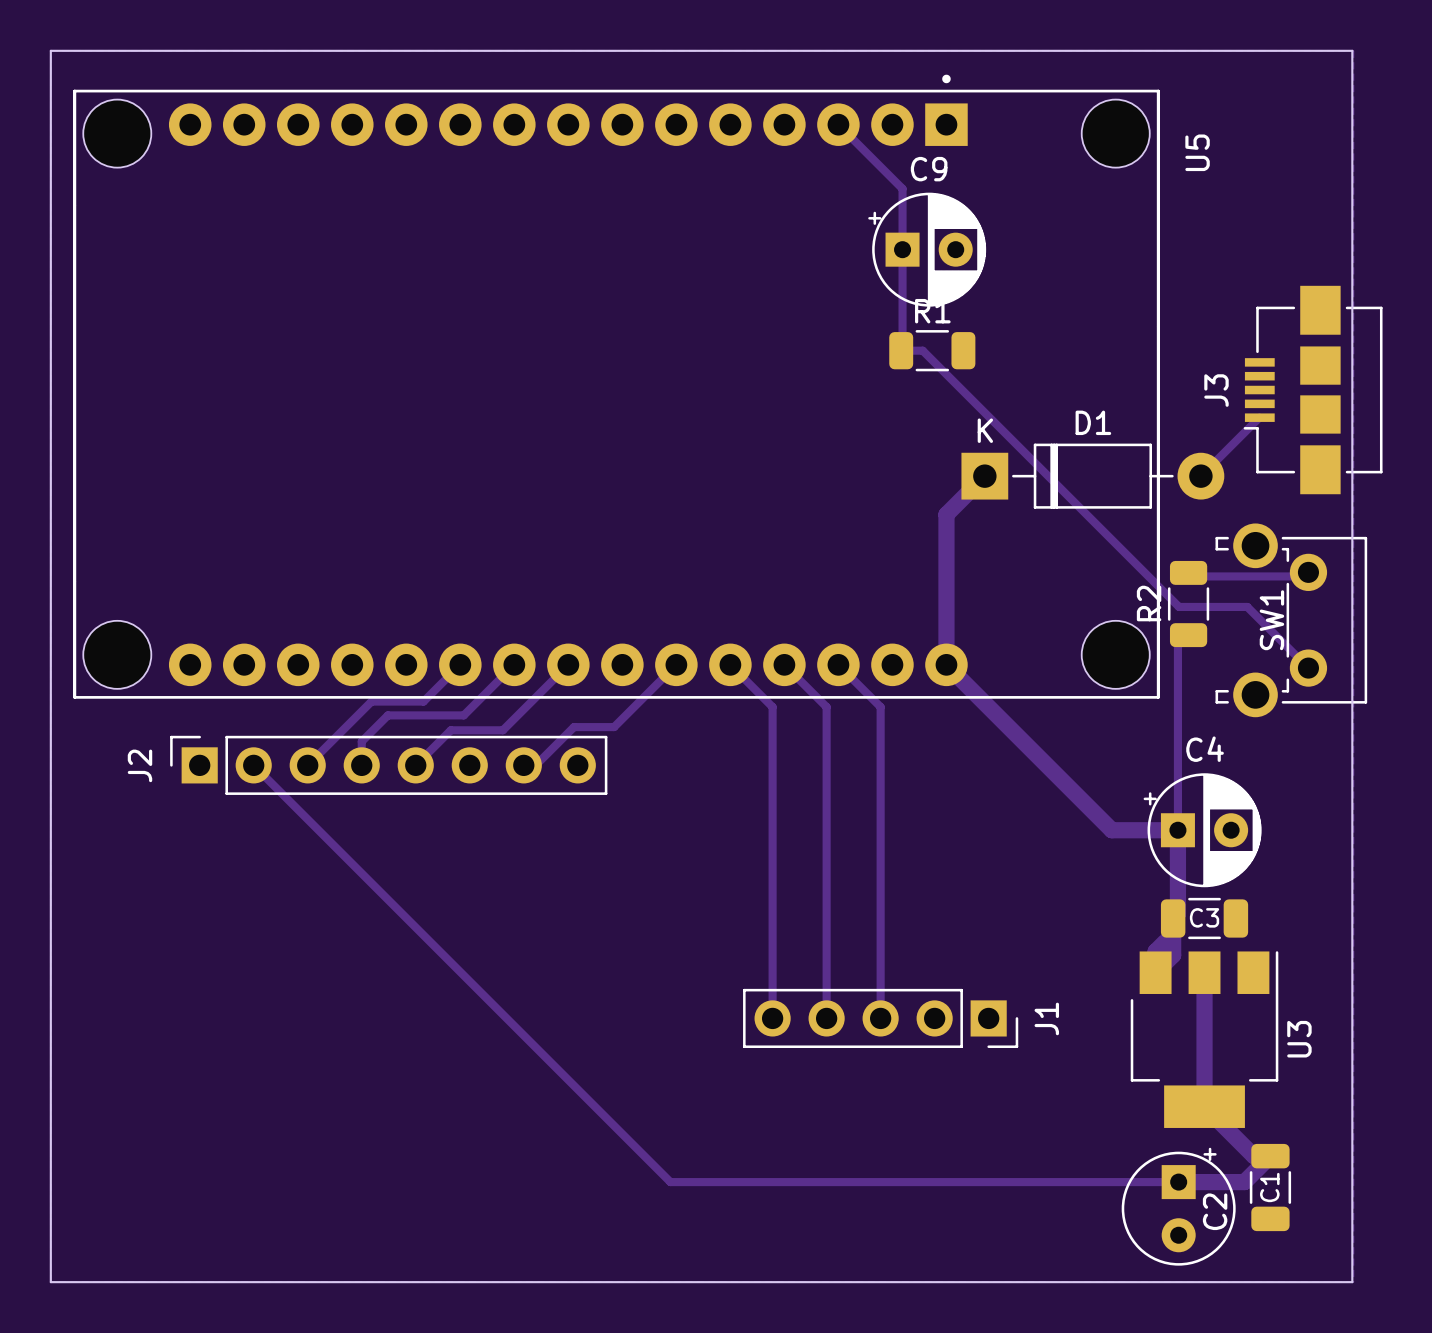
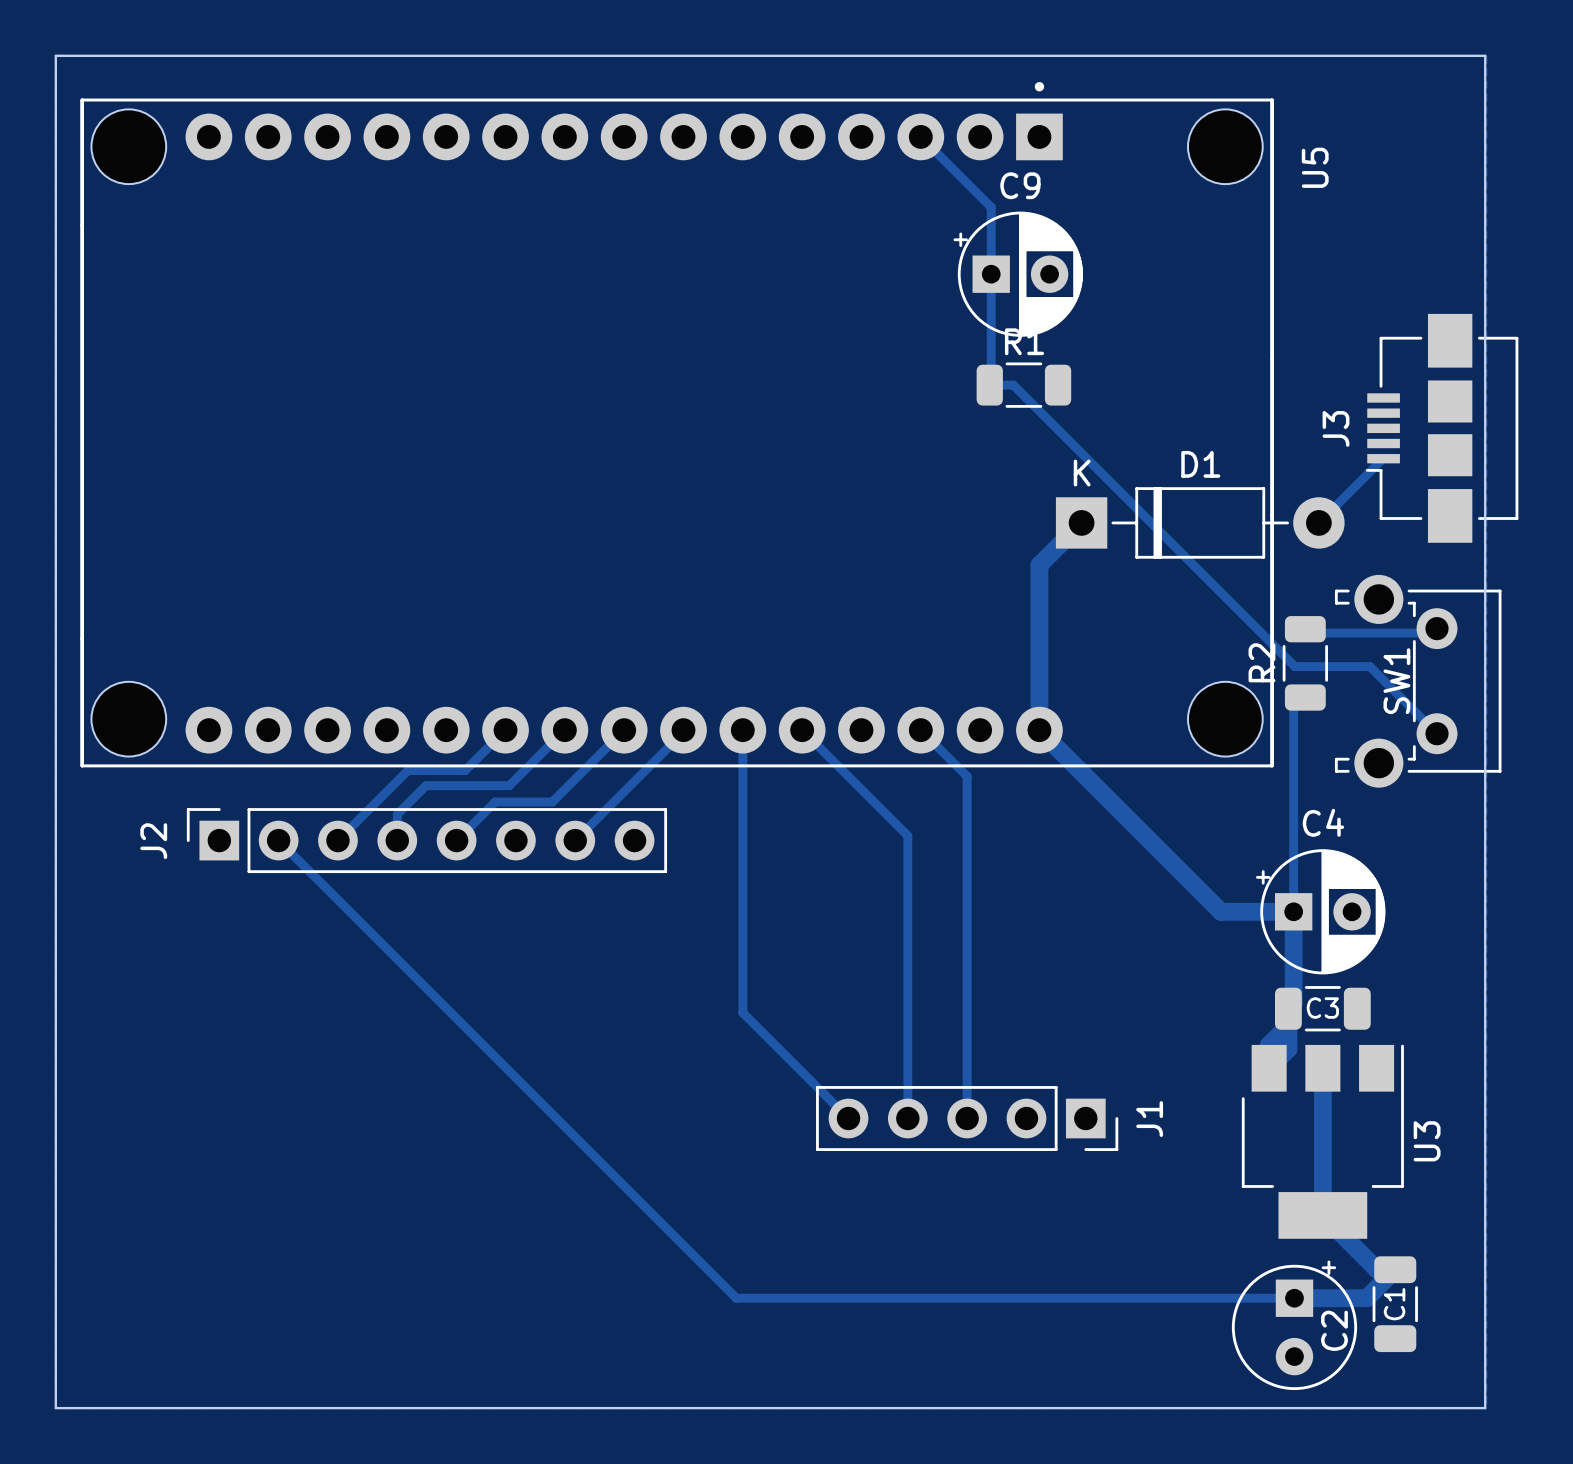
track: none -> (683, 730) (683, 732) (575, 840) (575, 838)
track: (676, 664) (614, 727) (573, 727) (535, 765) -> none
track: (784, 664) (826, 707) (826, 761) -> (848, 776) (907, 835)
track: (772, 707) (772, 1018) -> (742, 730) (742, 1012) (848, 1118)

